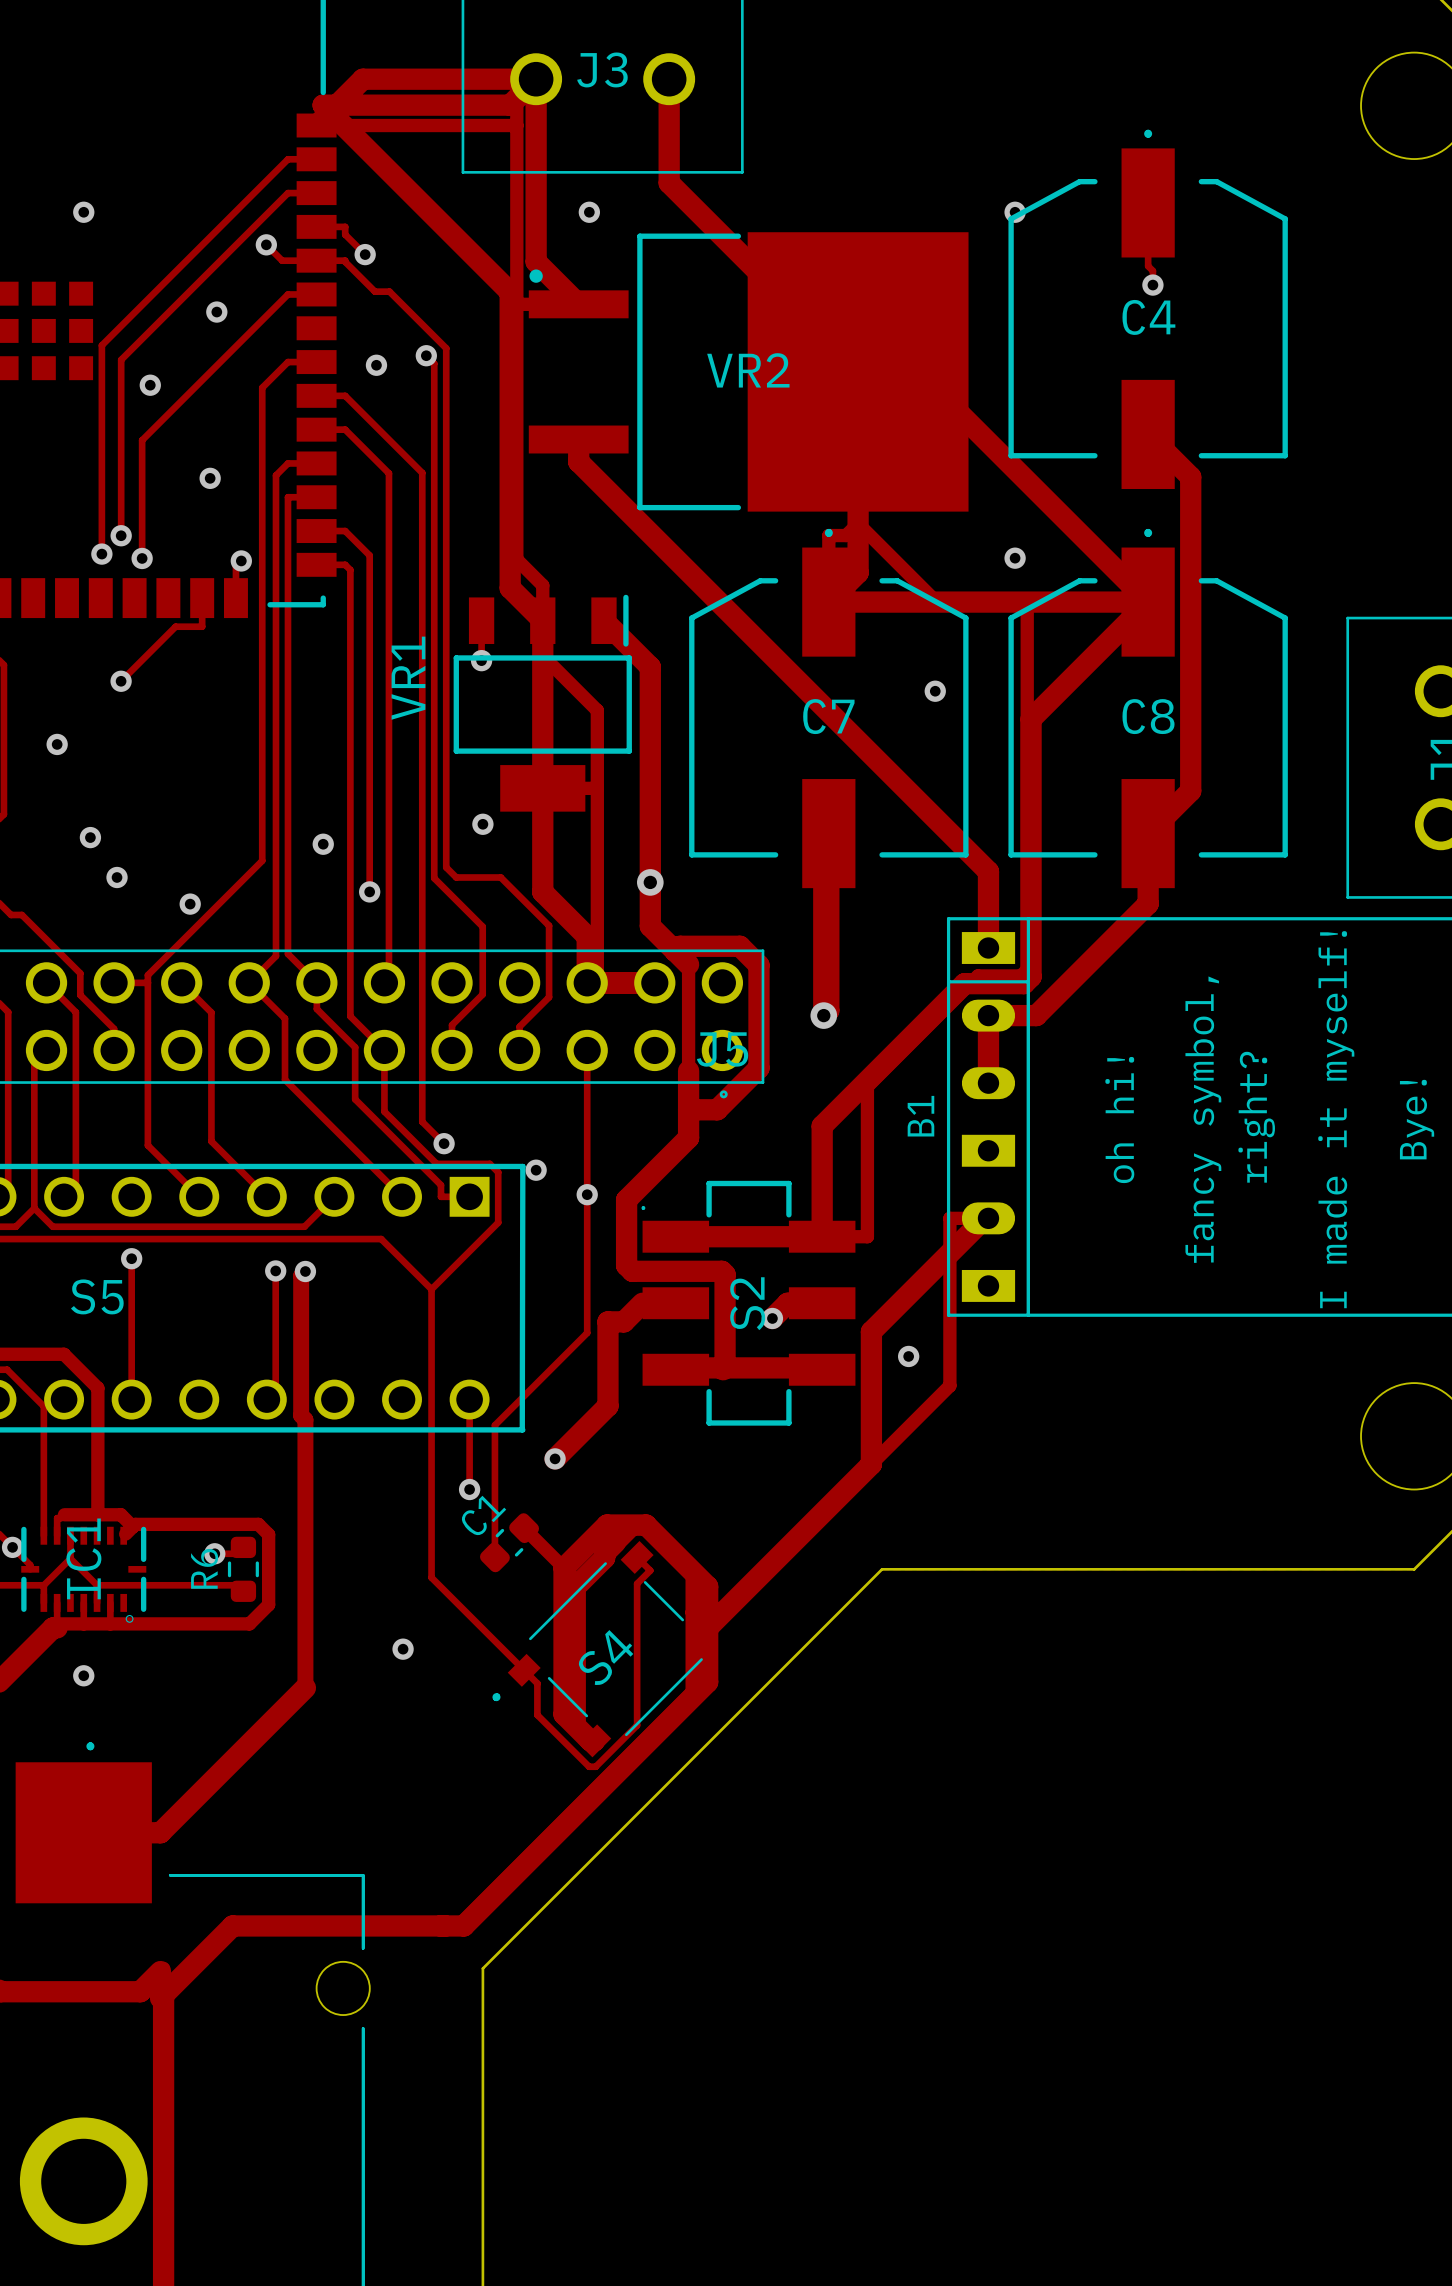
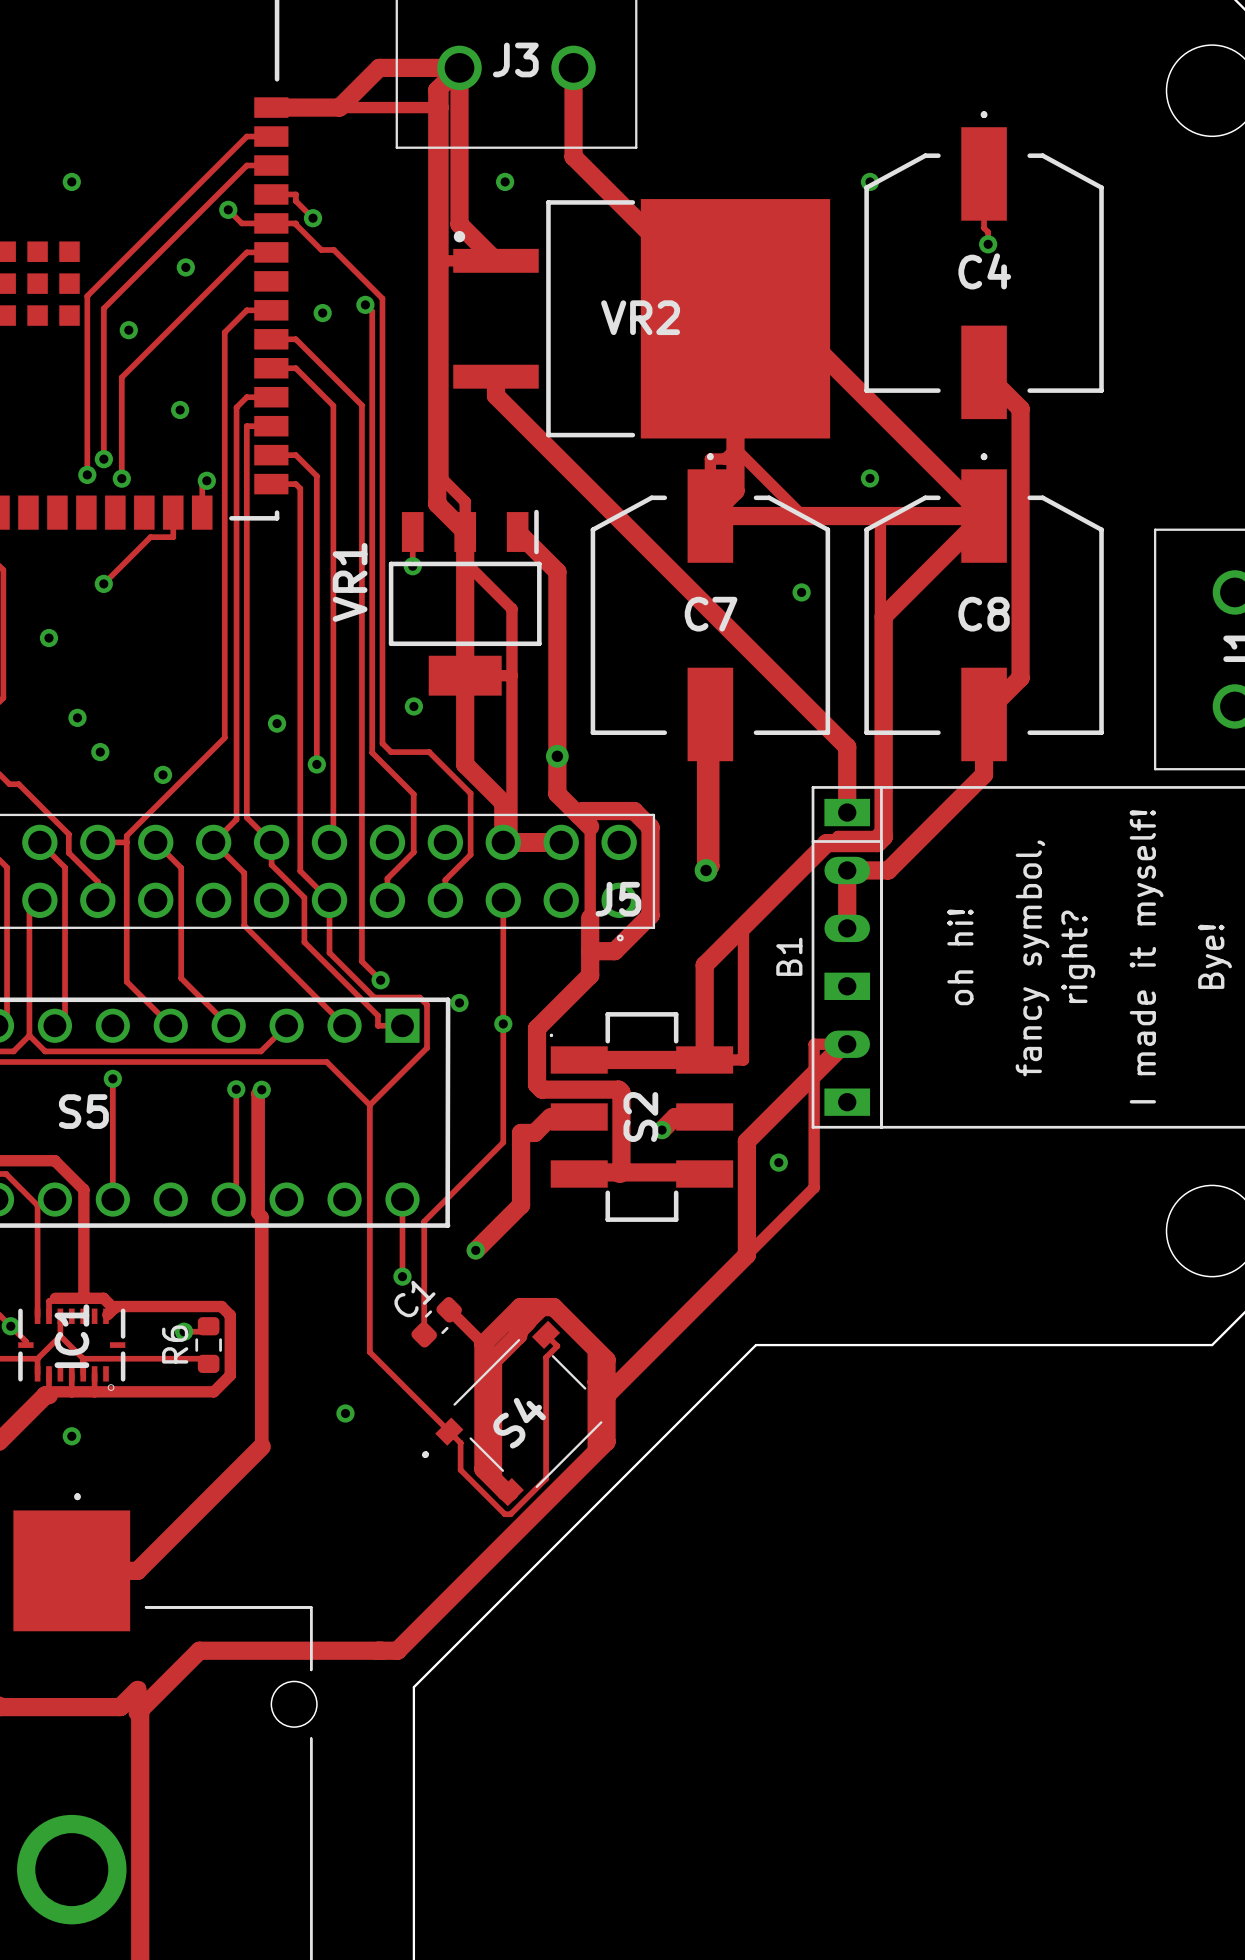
track: (442, 79) (362, 79) (316, 125) -> (379, 67) (339, 107) (271, 107)
track: (510, 105) (323, 105) (510, 292) -> (437, 90) (437, 250)

